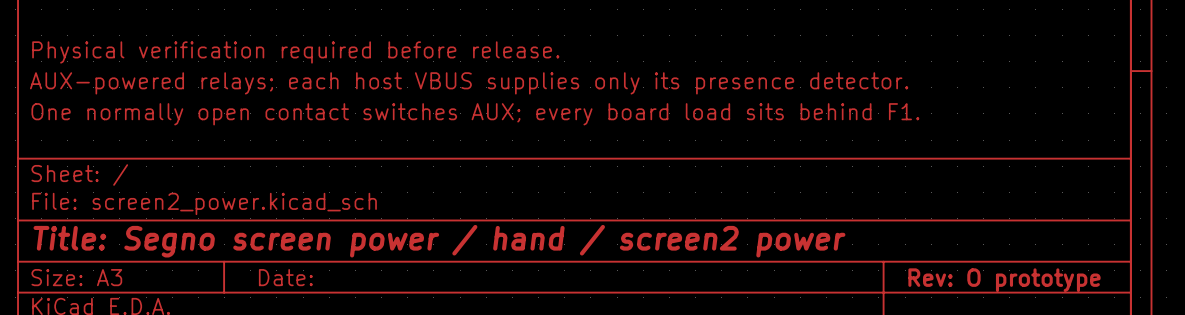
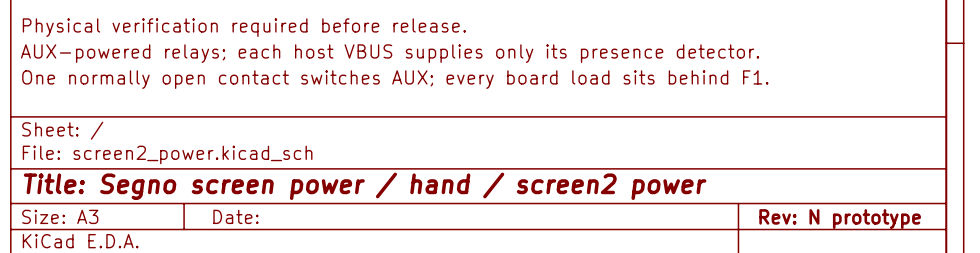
title block: Rev: O prototype (1004, 280) -> Rev: N prototype (840, 219)

